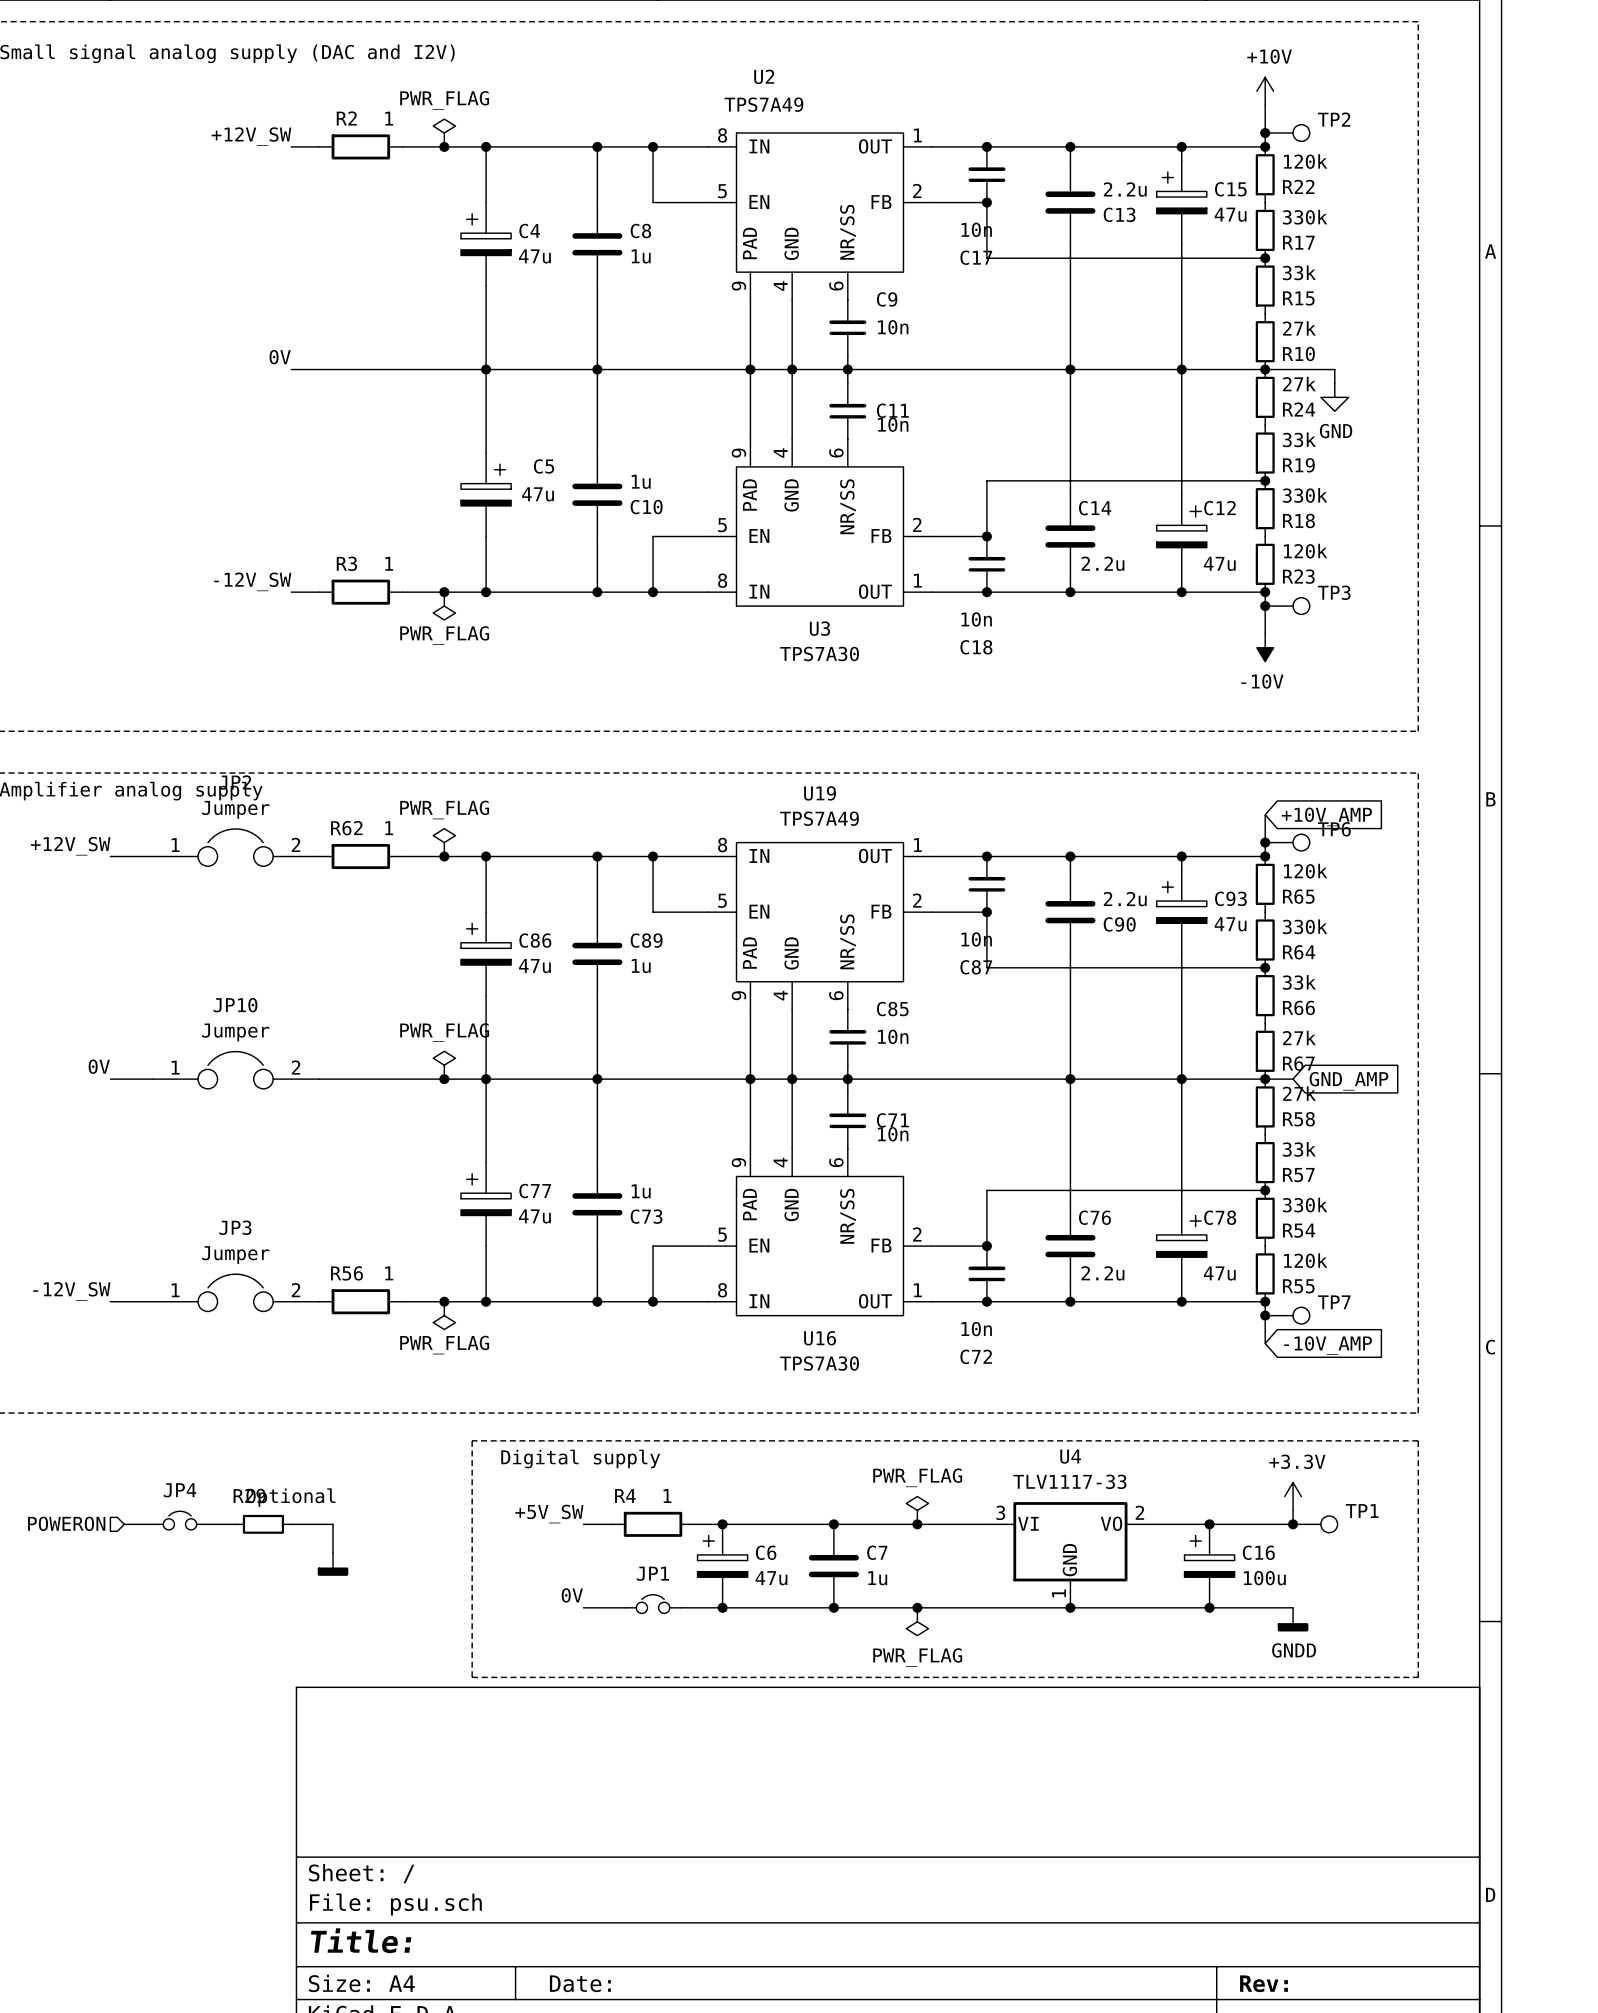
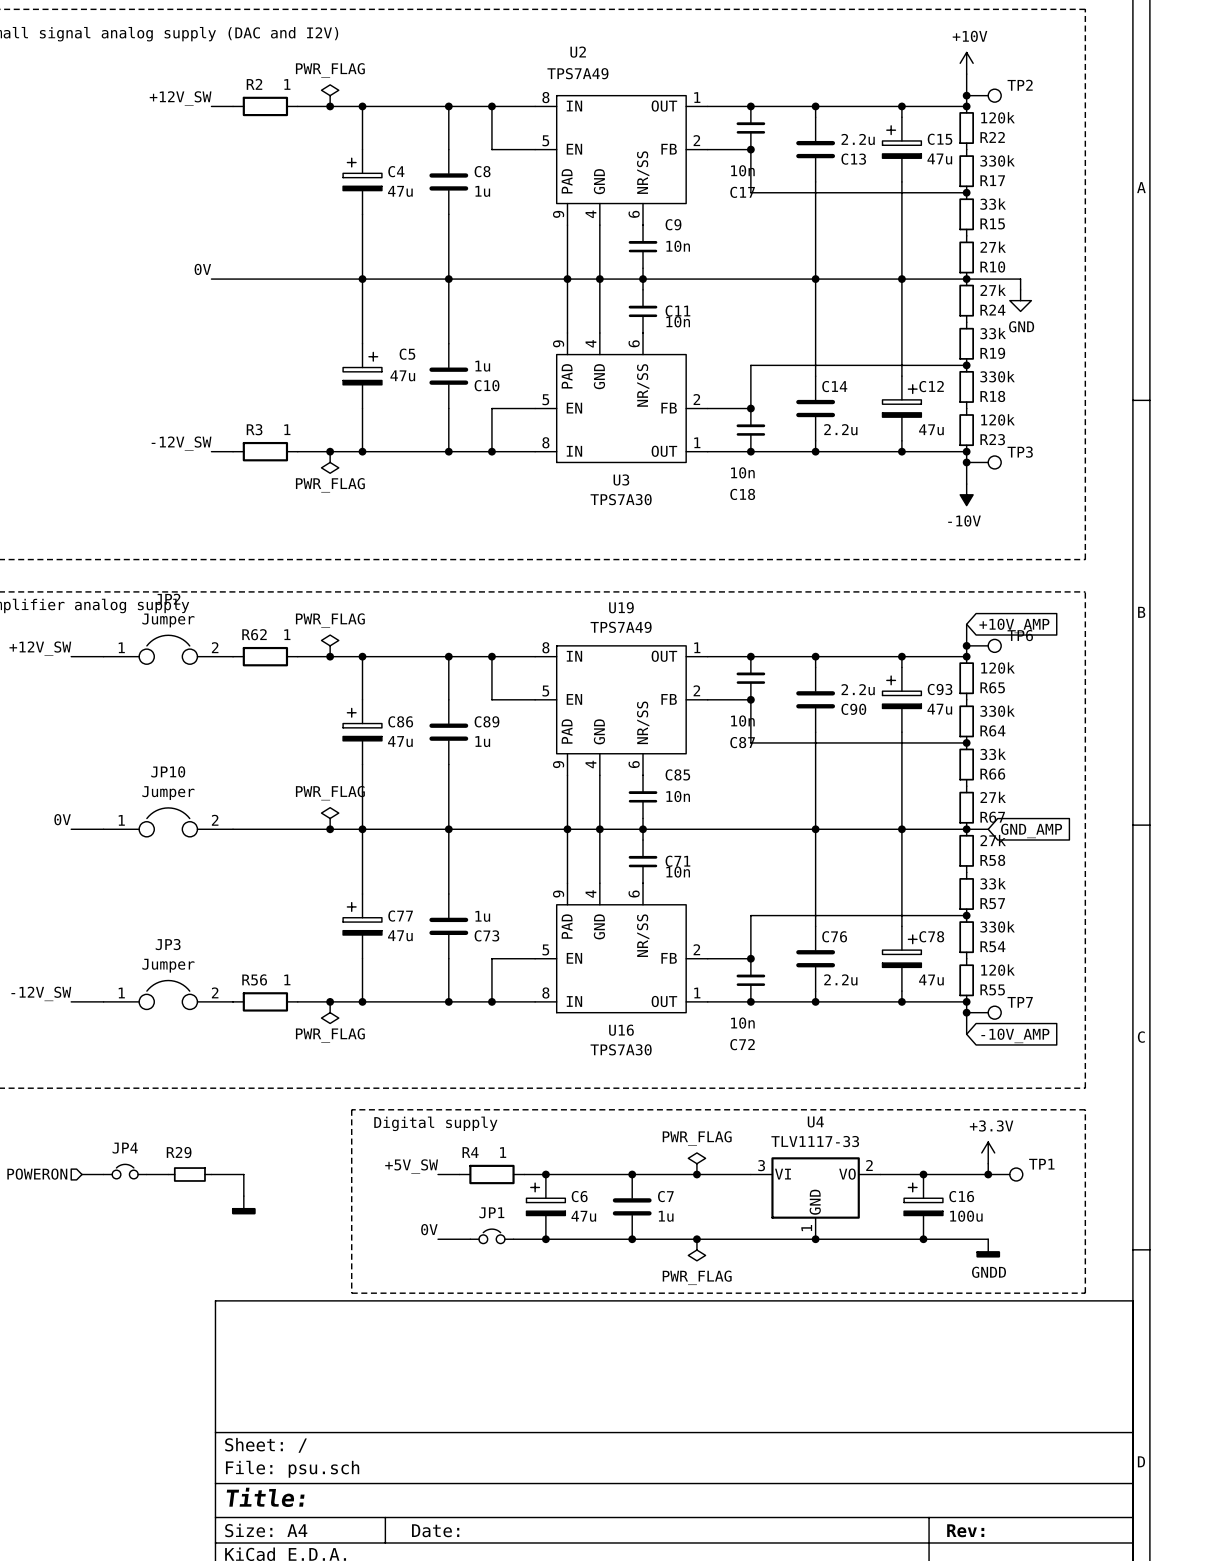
R29 value: Optional (290, 1497) -> none

